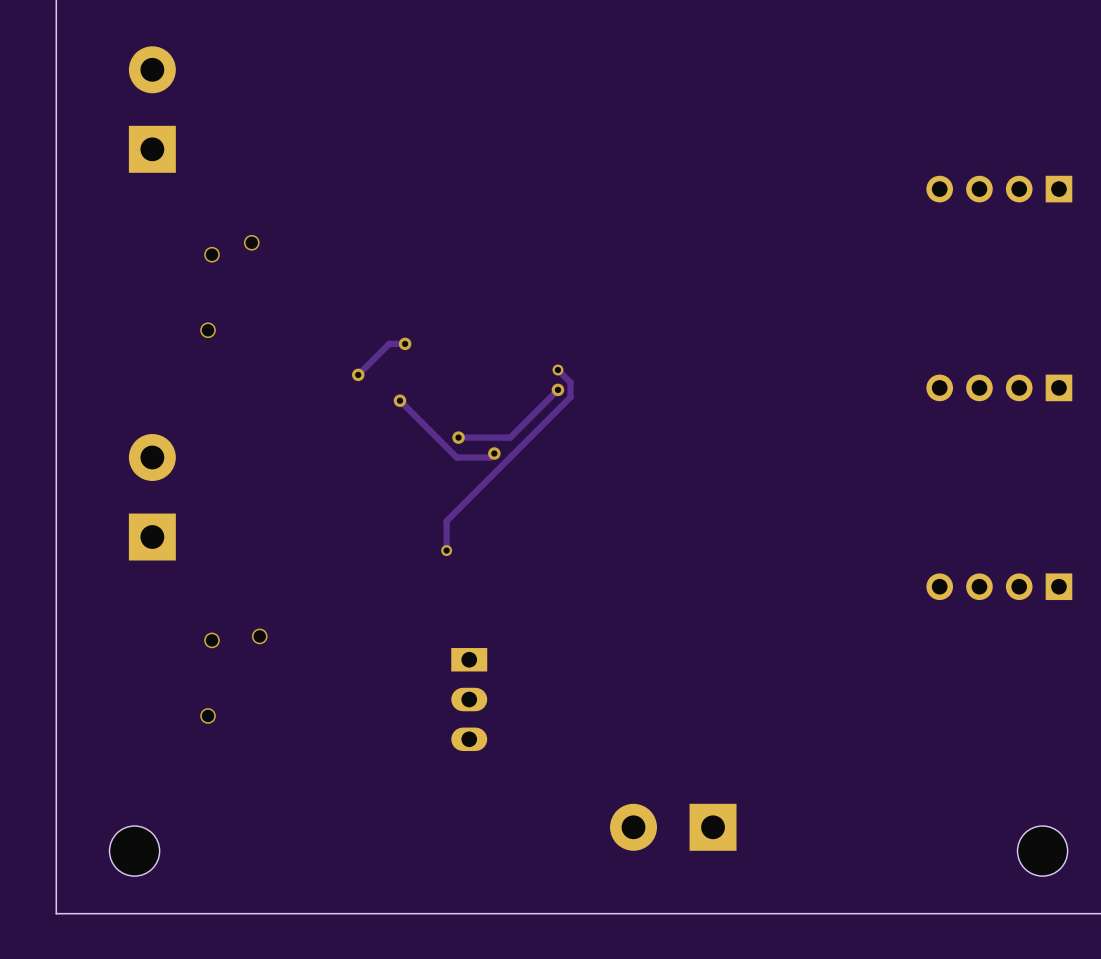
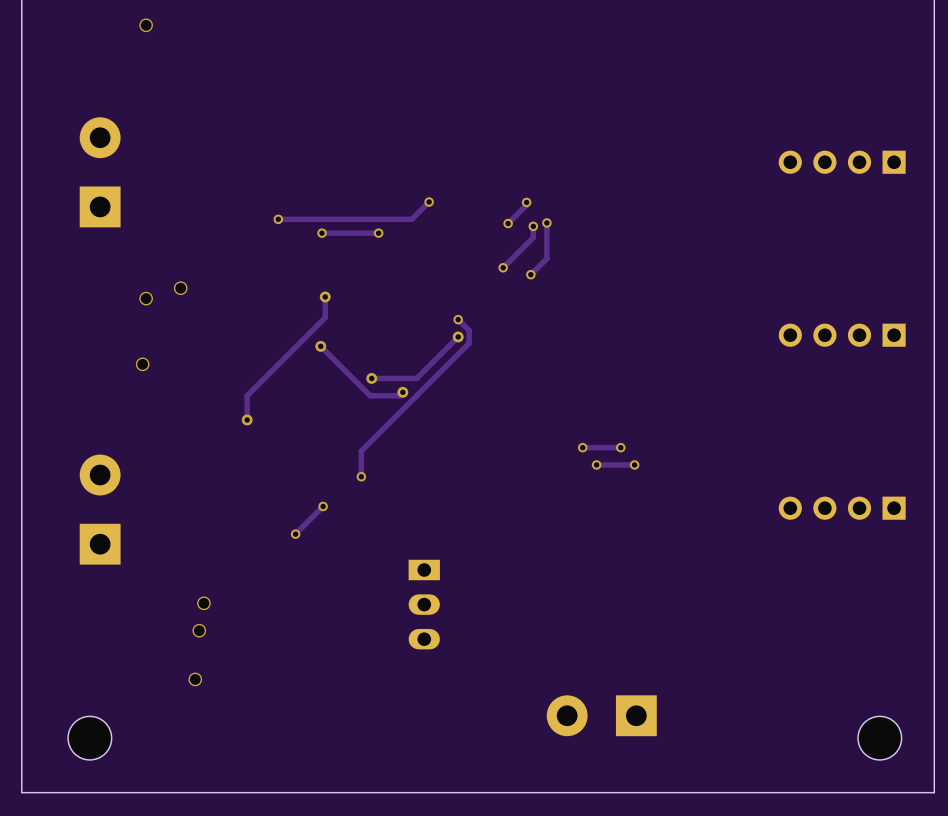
via: none -> (146, 25)
part position: (152, 109) -> (100, 172)
track: none -> (429, 202) (411, 219) (278, 219)
via: none -> (429, 202)
track: none -> (526, 202) (526, 205) (508, 223)
via: none -> (526, 202)
via: (251, 242) -> none
via: (212, 254) -> none
via: none -> (278, 219)
track: none -> (546, 222) (546, 258) (530, 274)
via: none -> (546, 222)
via: none -> (508, 223)
track: none -> (533, 226) (533, 237) (503, 267)
via: none -> (533, 226)
via: none -> (321, 233)
track: none -> (378, 233) (321, 233)
via: none -> (378, 233)
via: none -> (503, 267)
via: none -> (530, 274)
via: (208, 330) -> none
via: none -> (180, 288)
track: (405, 343) (389, 343) (358, 374) -> (325, 296) (325, 317) (247, 395) (247, 419)
via: none -> (146, 298)
via: (358, 374) -> none
via: none -> (142, 364)
via: none -> (247, 419)
part position: (152, 497) -> (100, 509)
via: none -> (582, 447)
track: none -> (620, 447) (582, 447)
via: none -> (620, 447)
via: none -> (596, 464)
track: none -> (634, 464) (596, 464)
via: none -> (634, 464)
track: none -> (323, 506) (295, 533)
via: none -> (323, 506)
via: none -> (295, 534)
via: (259, 636) -> none
via: (212, 640) -> none
via: none -> (203, 603)
part position: (469, 699) -> (424, 604)
via: (208, 715) -> none
via: none -> (199, 630)
via: none -> (195, 679)
part position: (673, 827) -> (601, 715)

